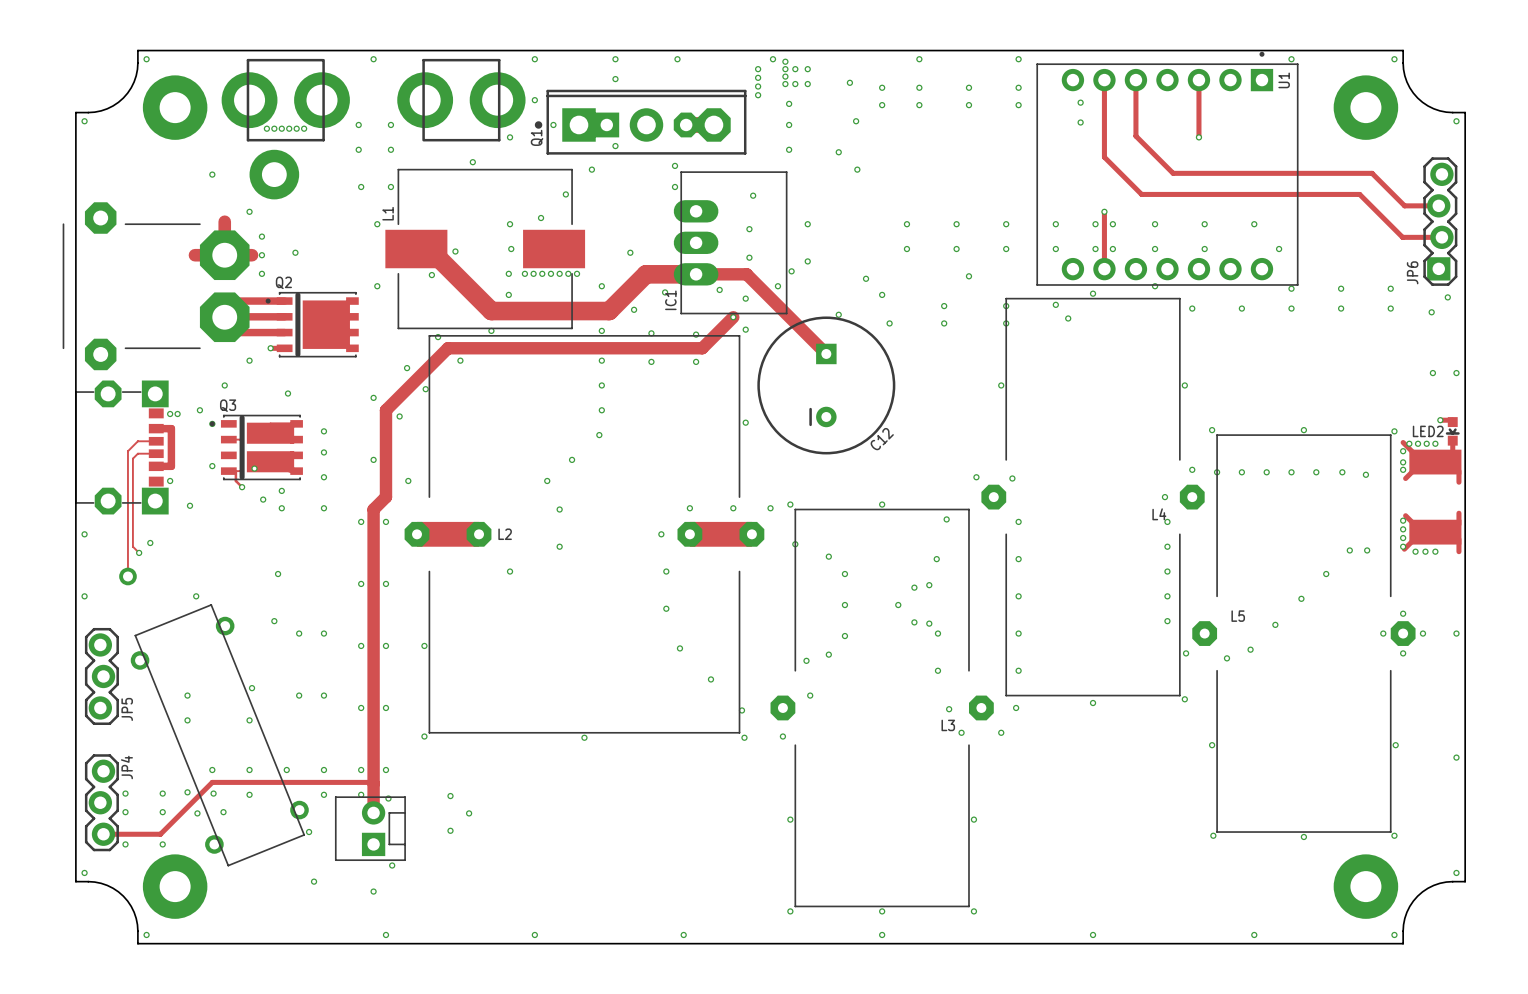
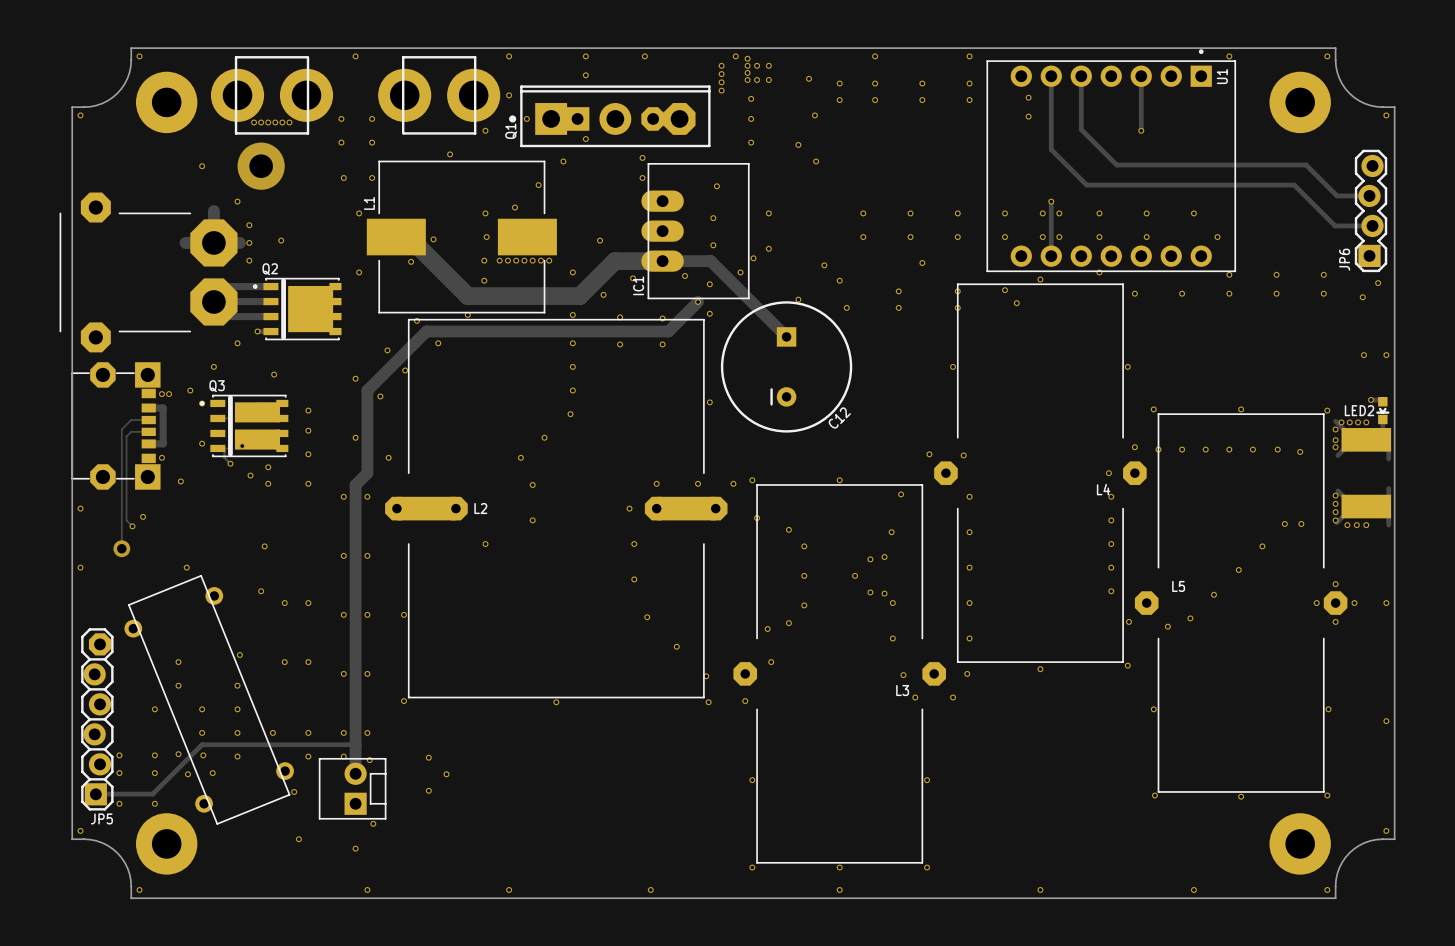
JP5 footprint: [84, 627, 119, 725] -> [81, 628, 114, 811]
JP5 name position: JP5 (127, 709) -> JP5 (101, 818)
via: none -> (154, 709)
via: none -> (202, 709)
via: none -> (237, 709)
JP4: (101, 802) -> none

